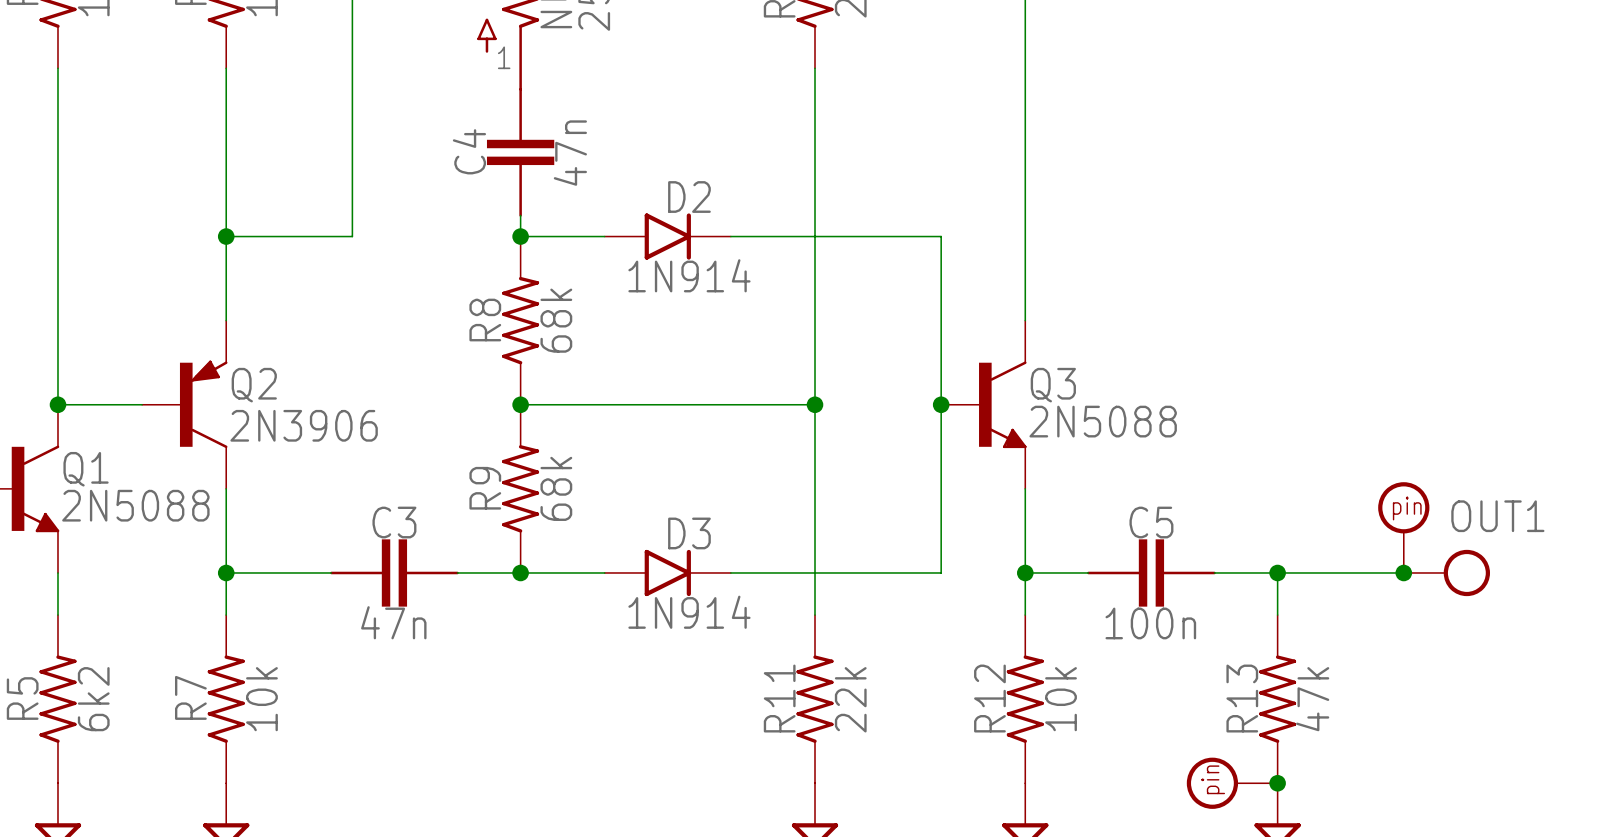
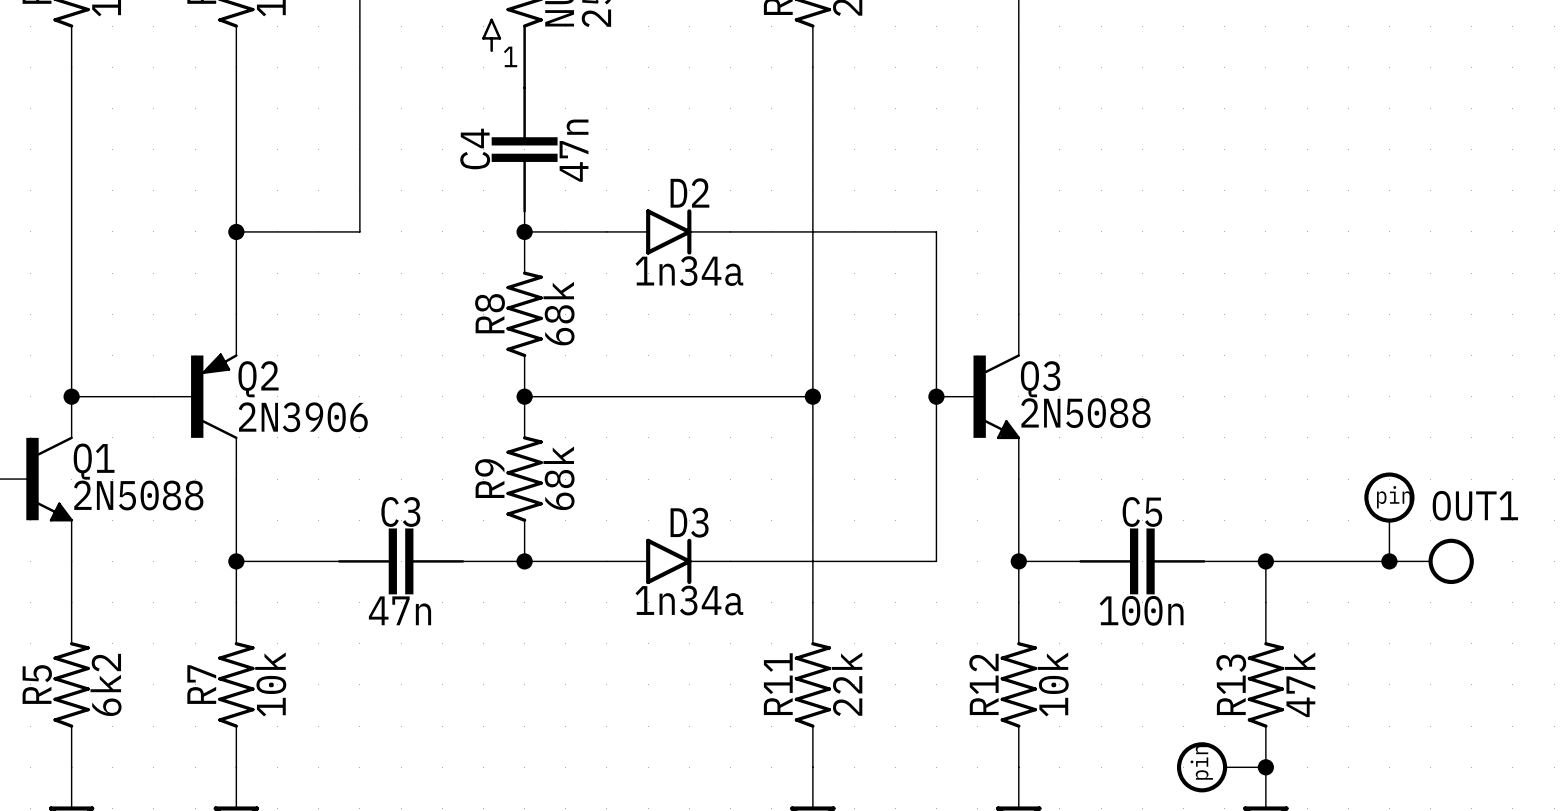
D2 value: 1N914 (689, 275) -> 1n34a (689, 271)
D3 value: 1N914 (689, 612) -> 1n34a (689, 600)

